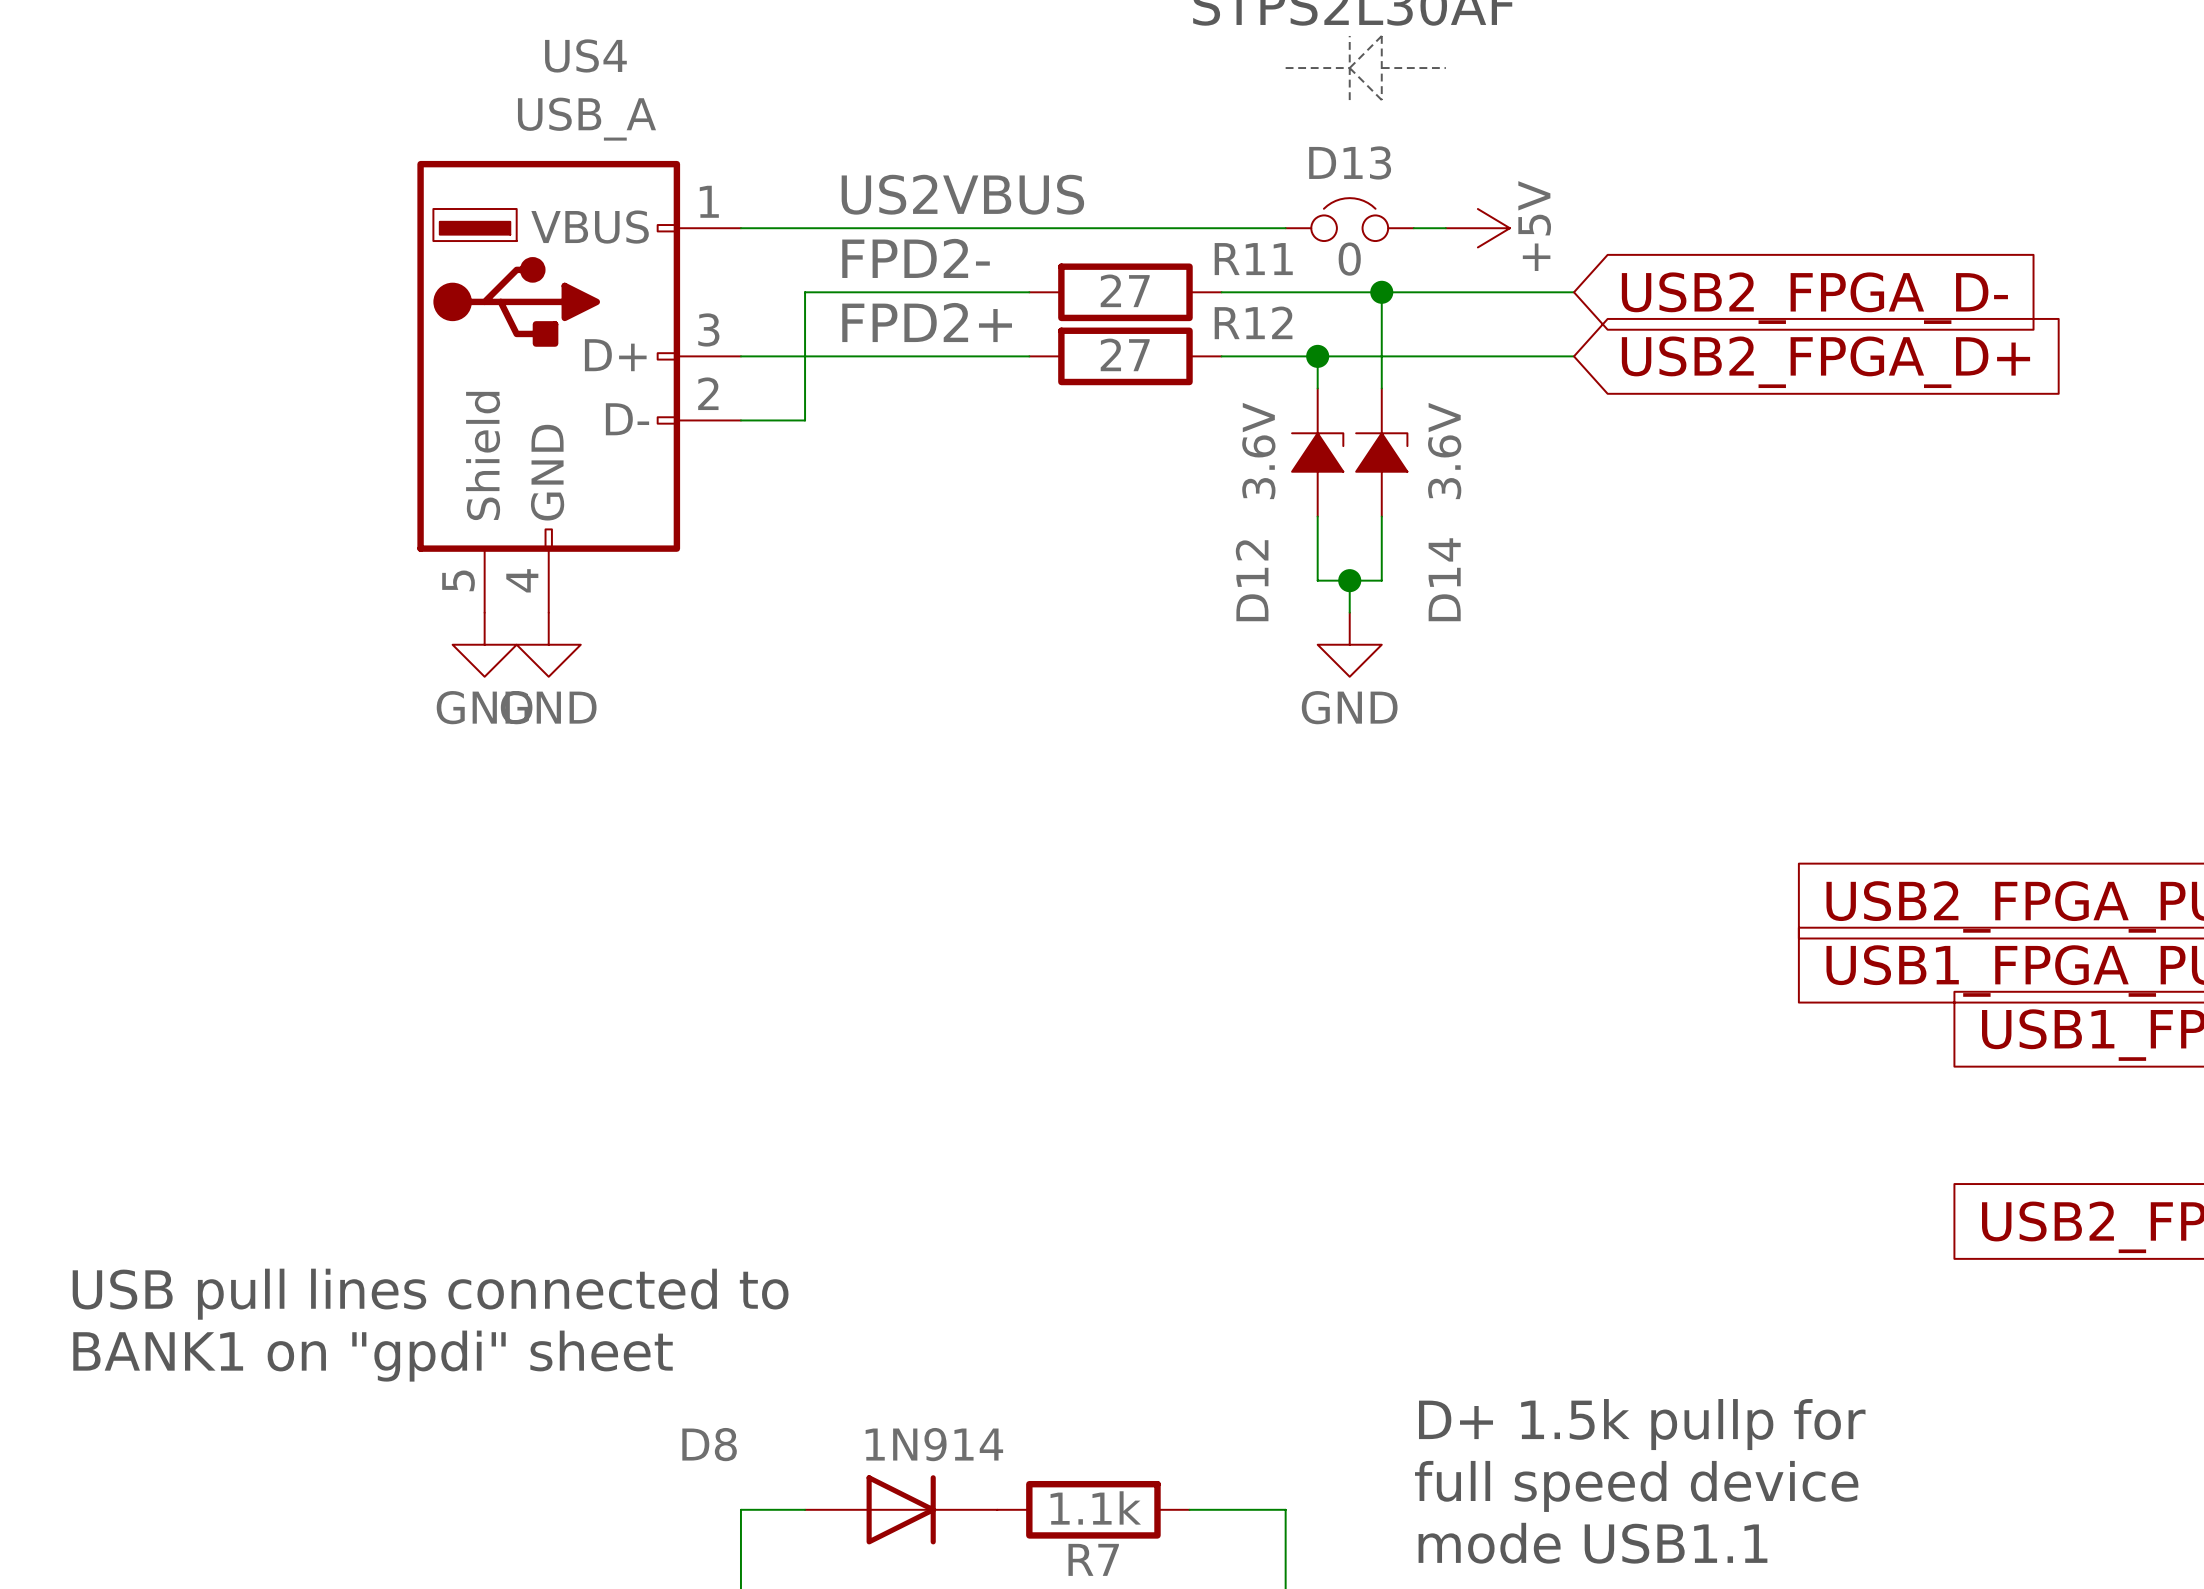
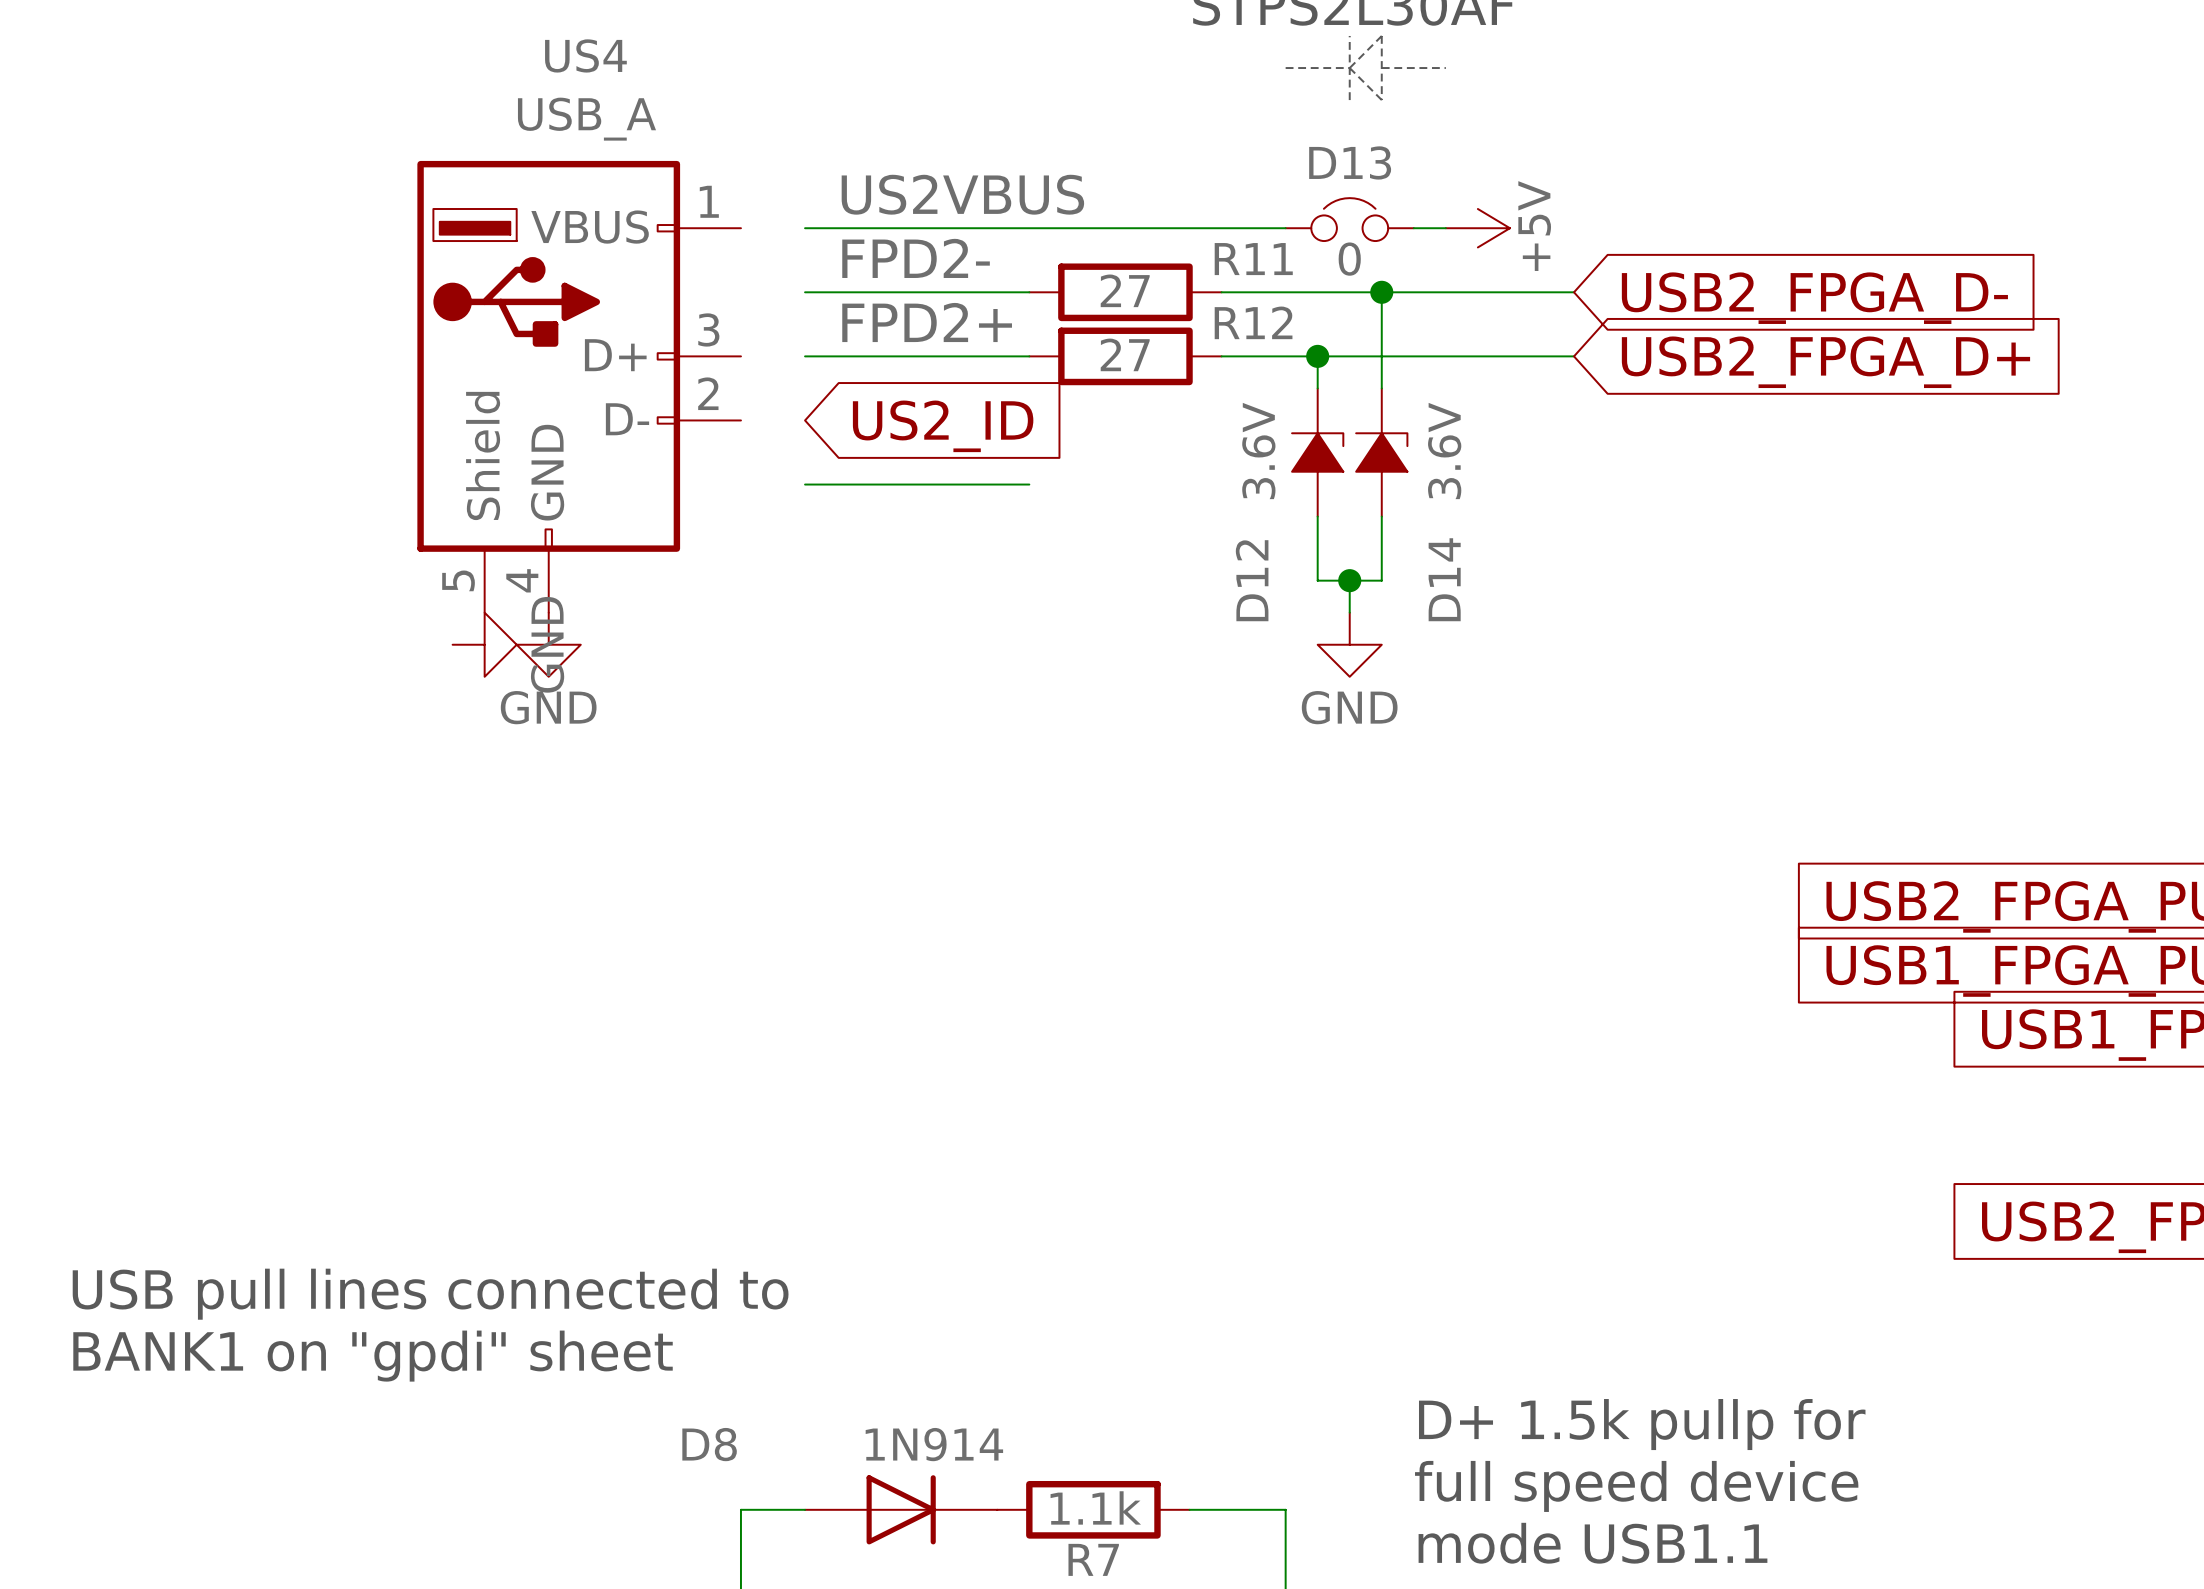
wire: (740, 228) (805, 228) -> none
wire: (805, 292) (805, 420) (740, 420) -> none
wire: (740, 356) (805, 356) -> none
global label: none -> US2_ID (943, 426)
wire: none -> (805, 484) (1029, 484)
power symbol rotation: 0° (484, 644) -> 90° counterclockwise (484, 644)

